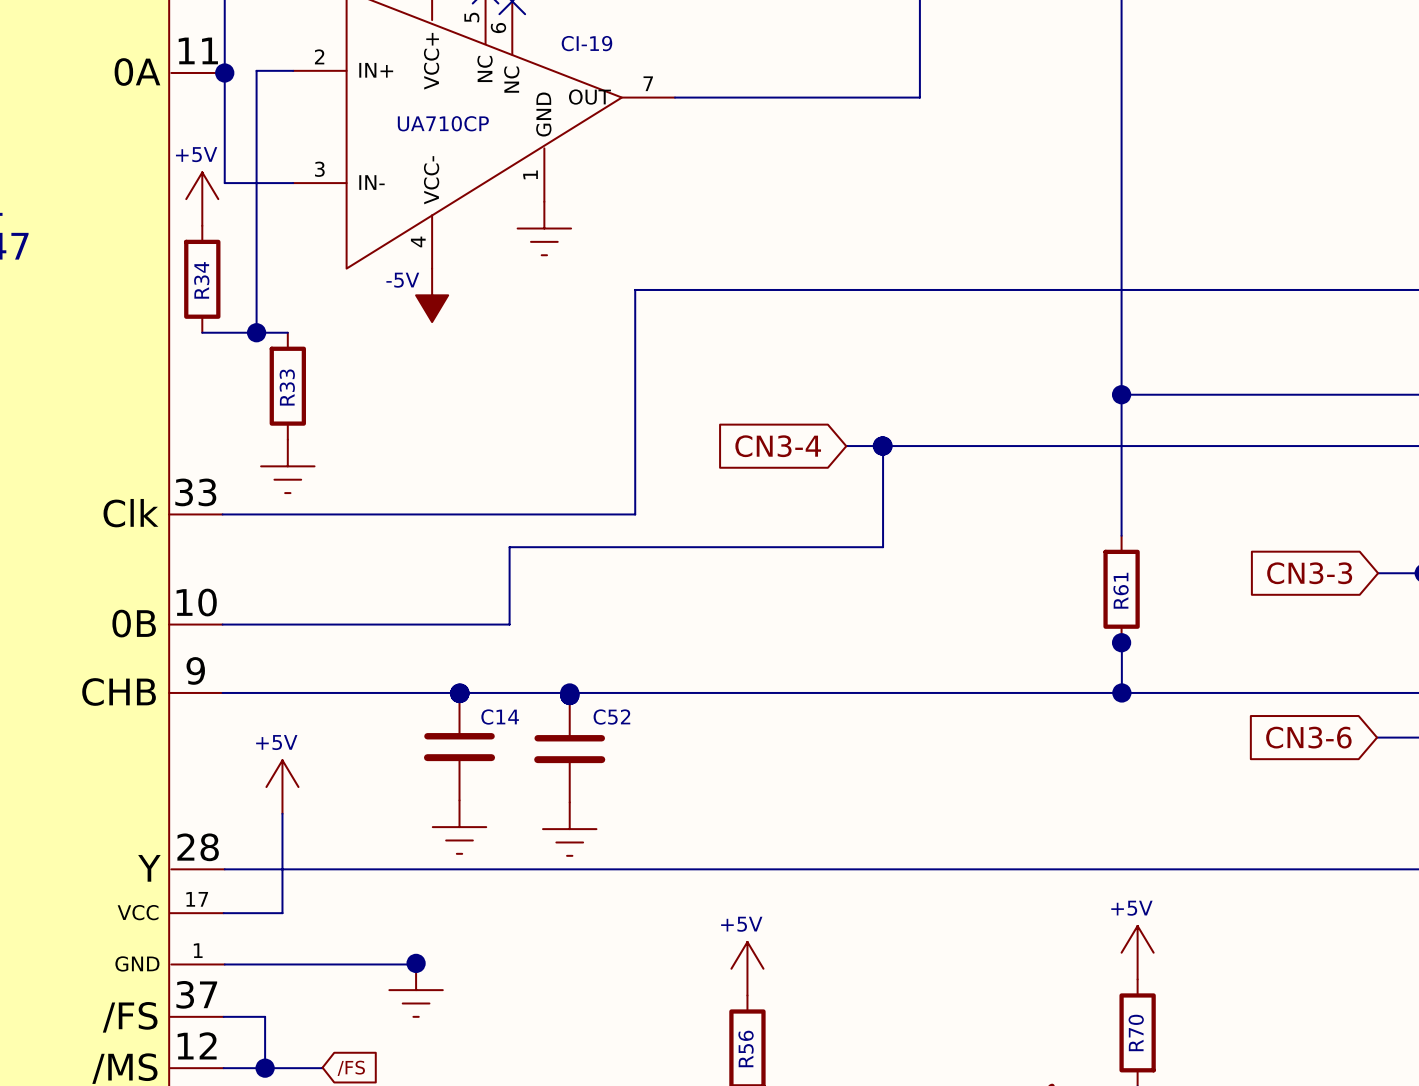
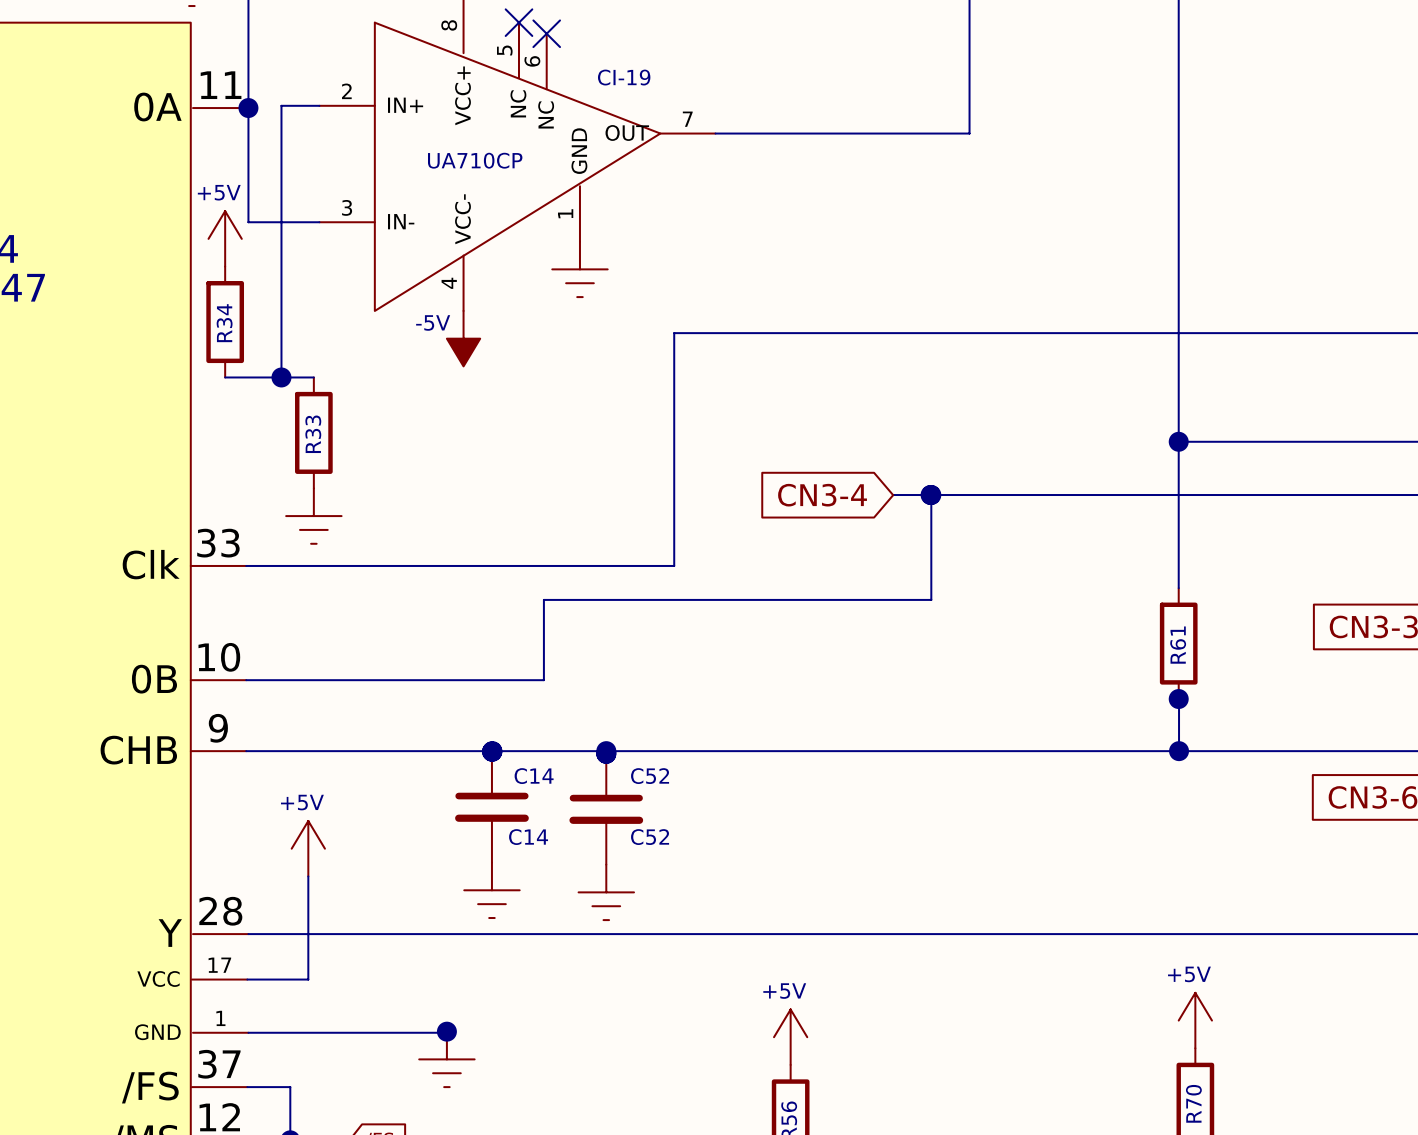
C14 value: none -> C14 (528, 837)
C52 value: none -> C52 (650, 837)

